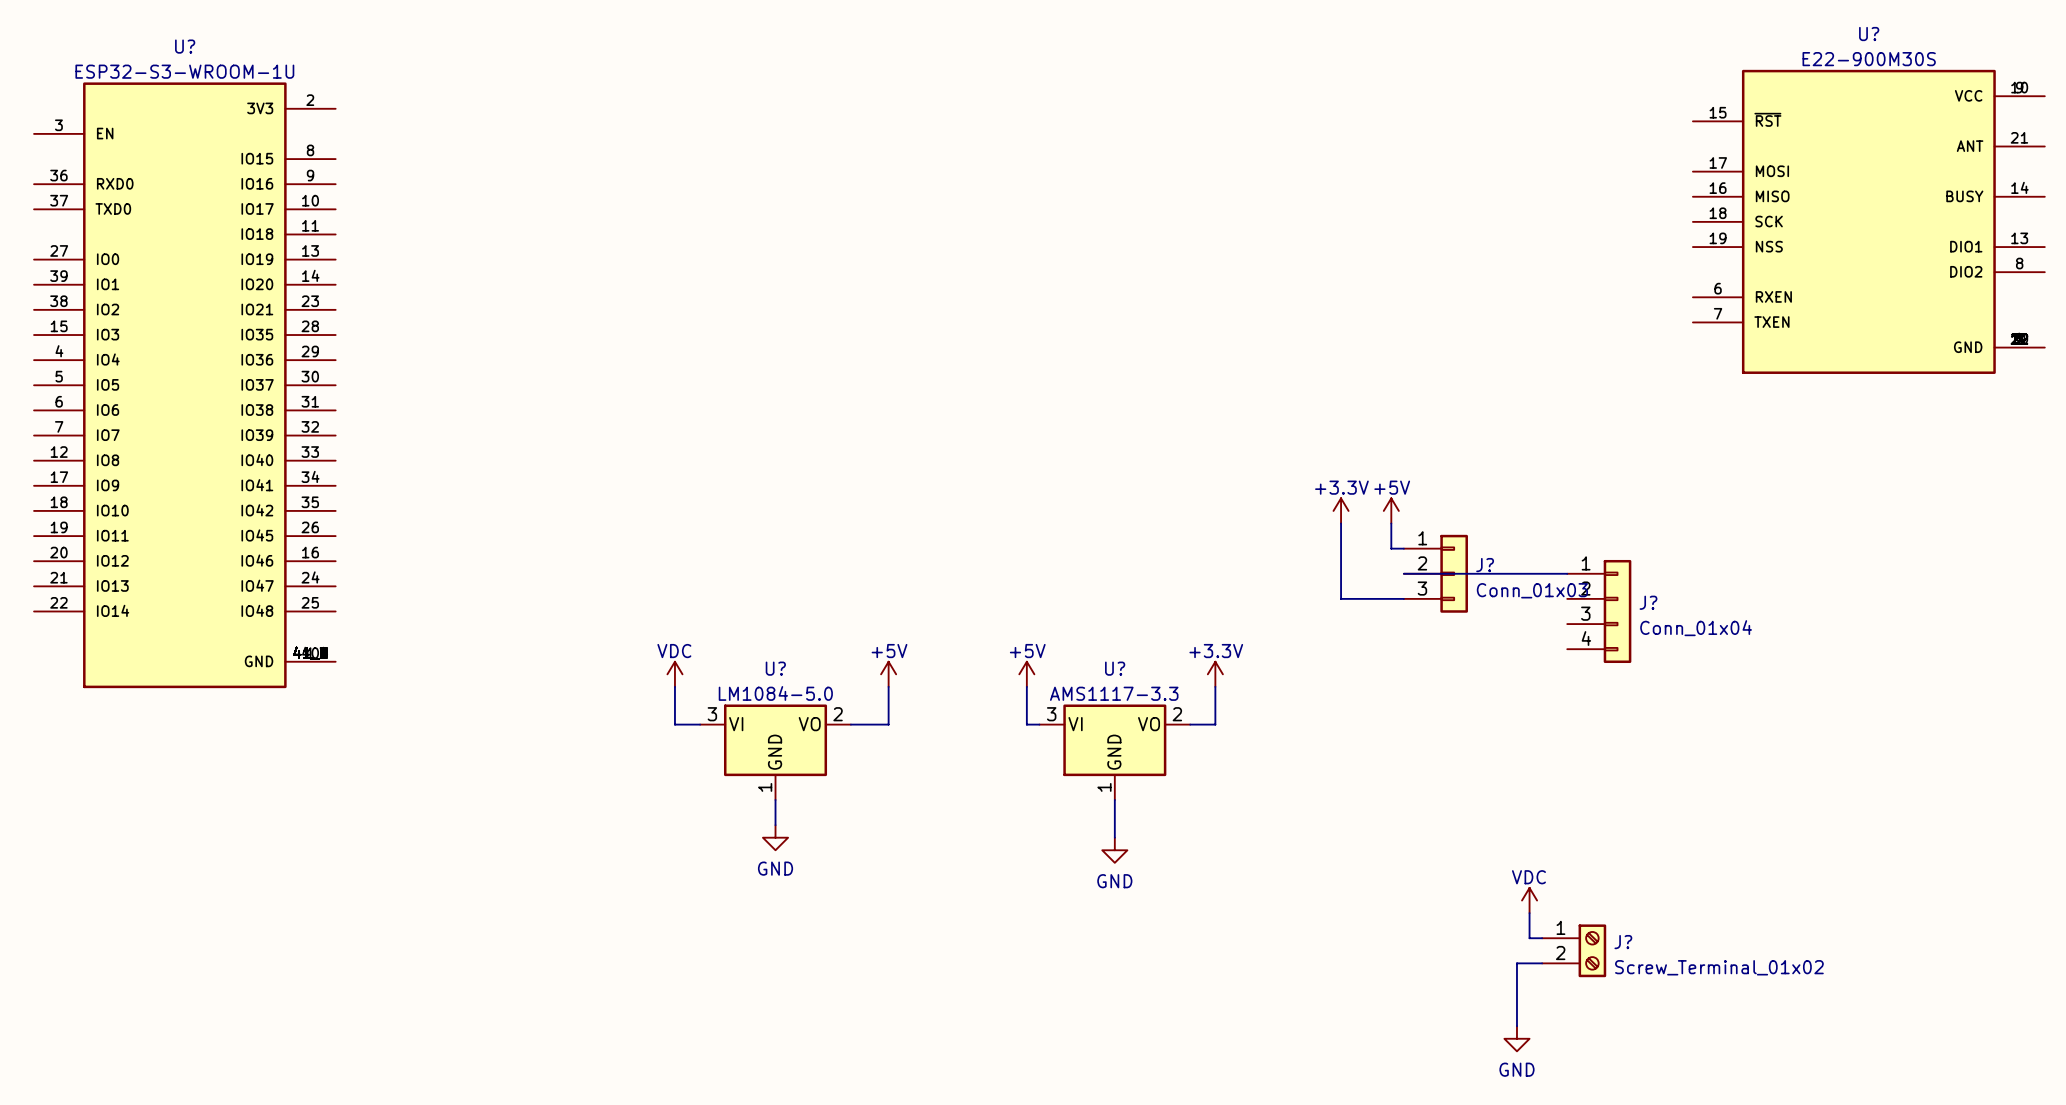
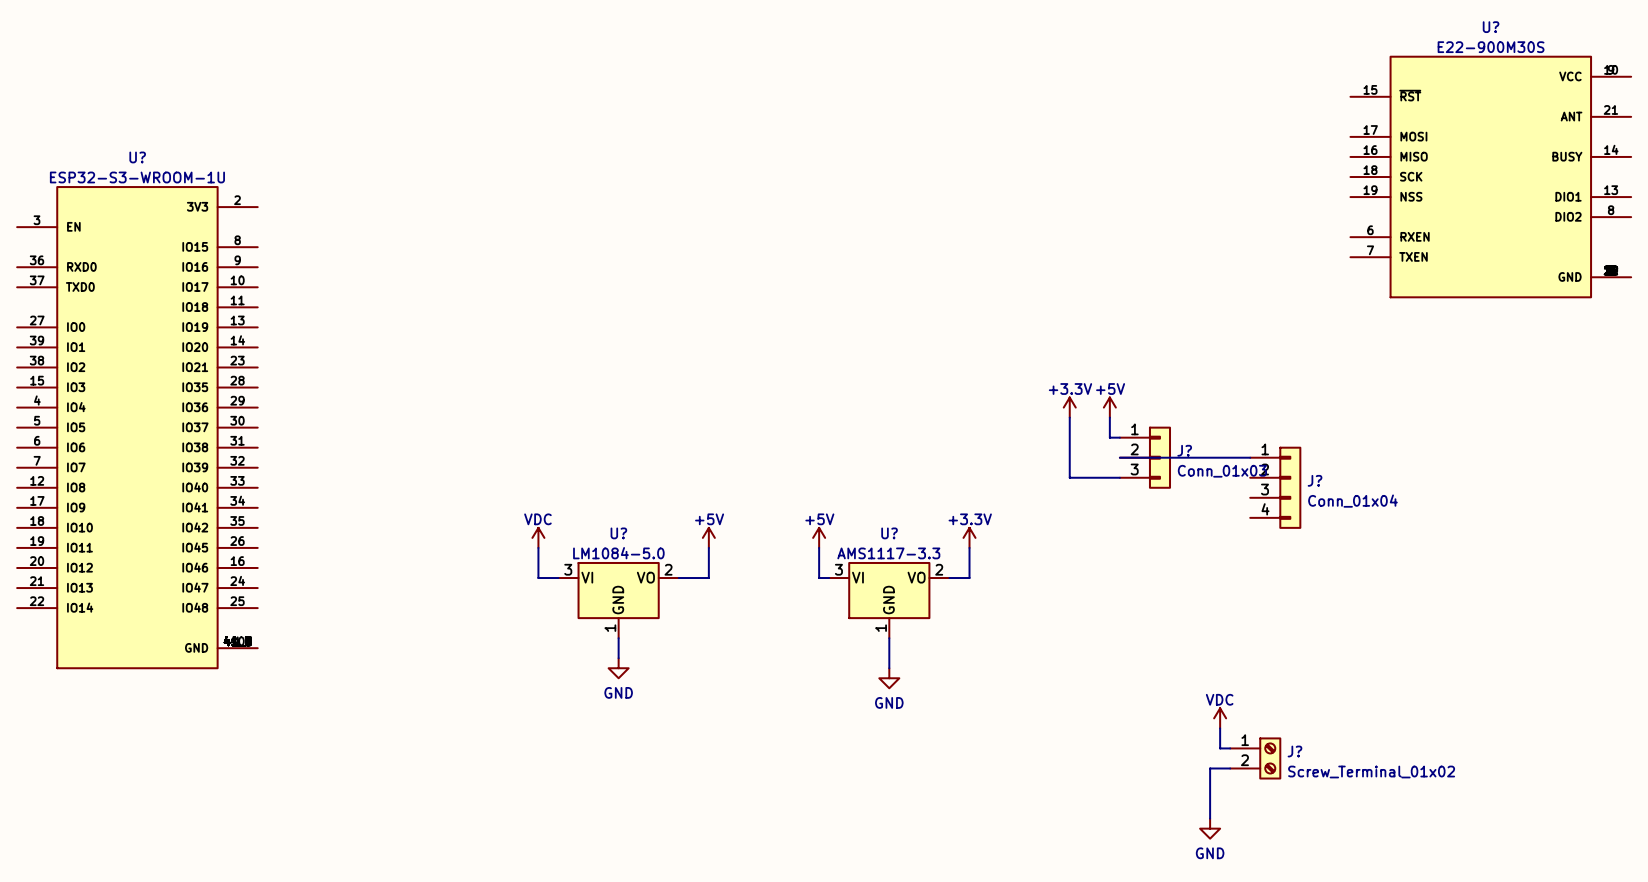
U? position: (184, 385) -> (137, 427)

